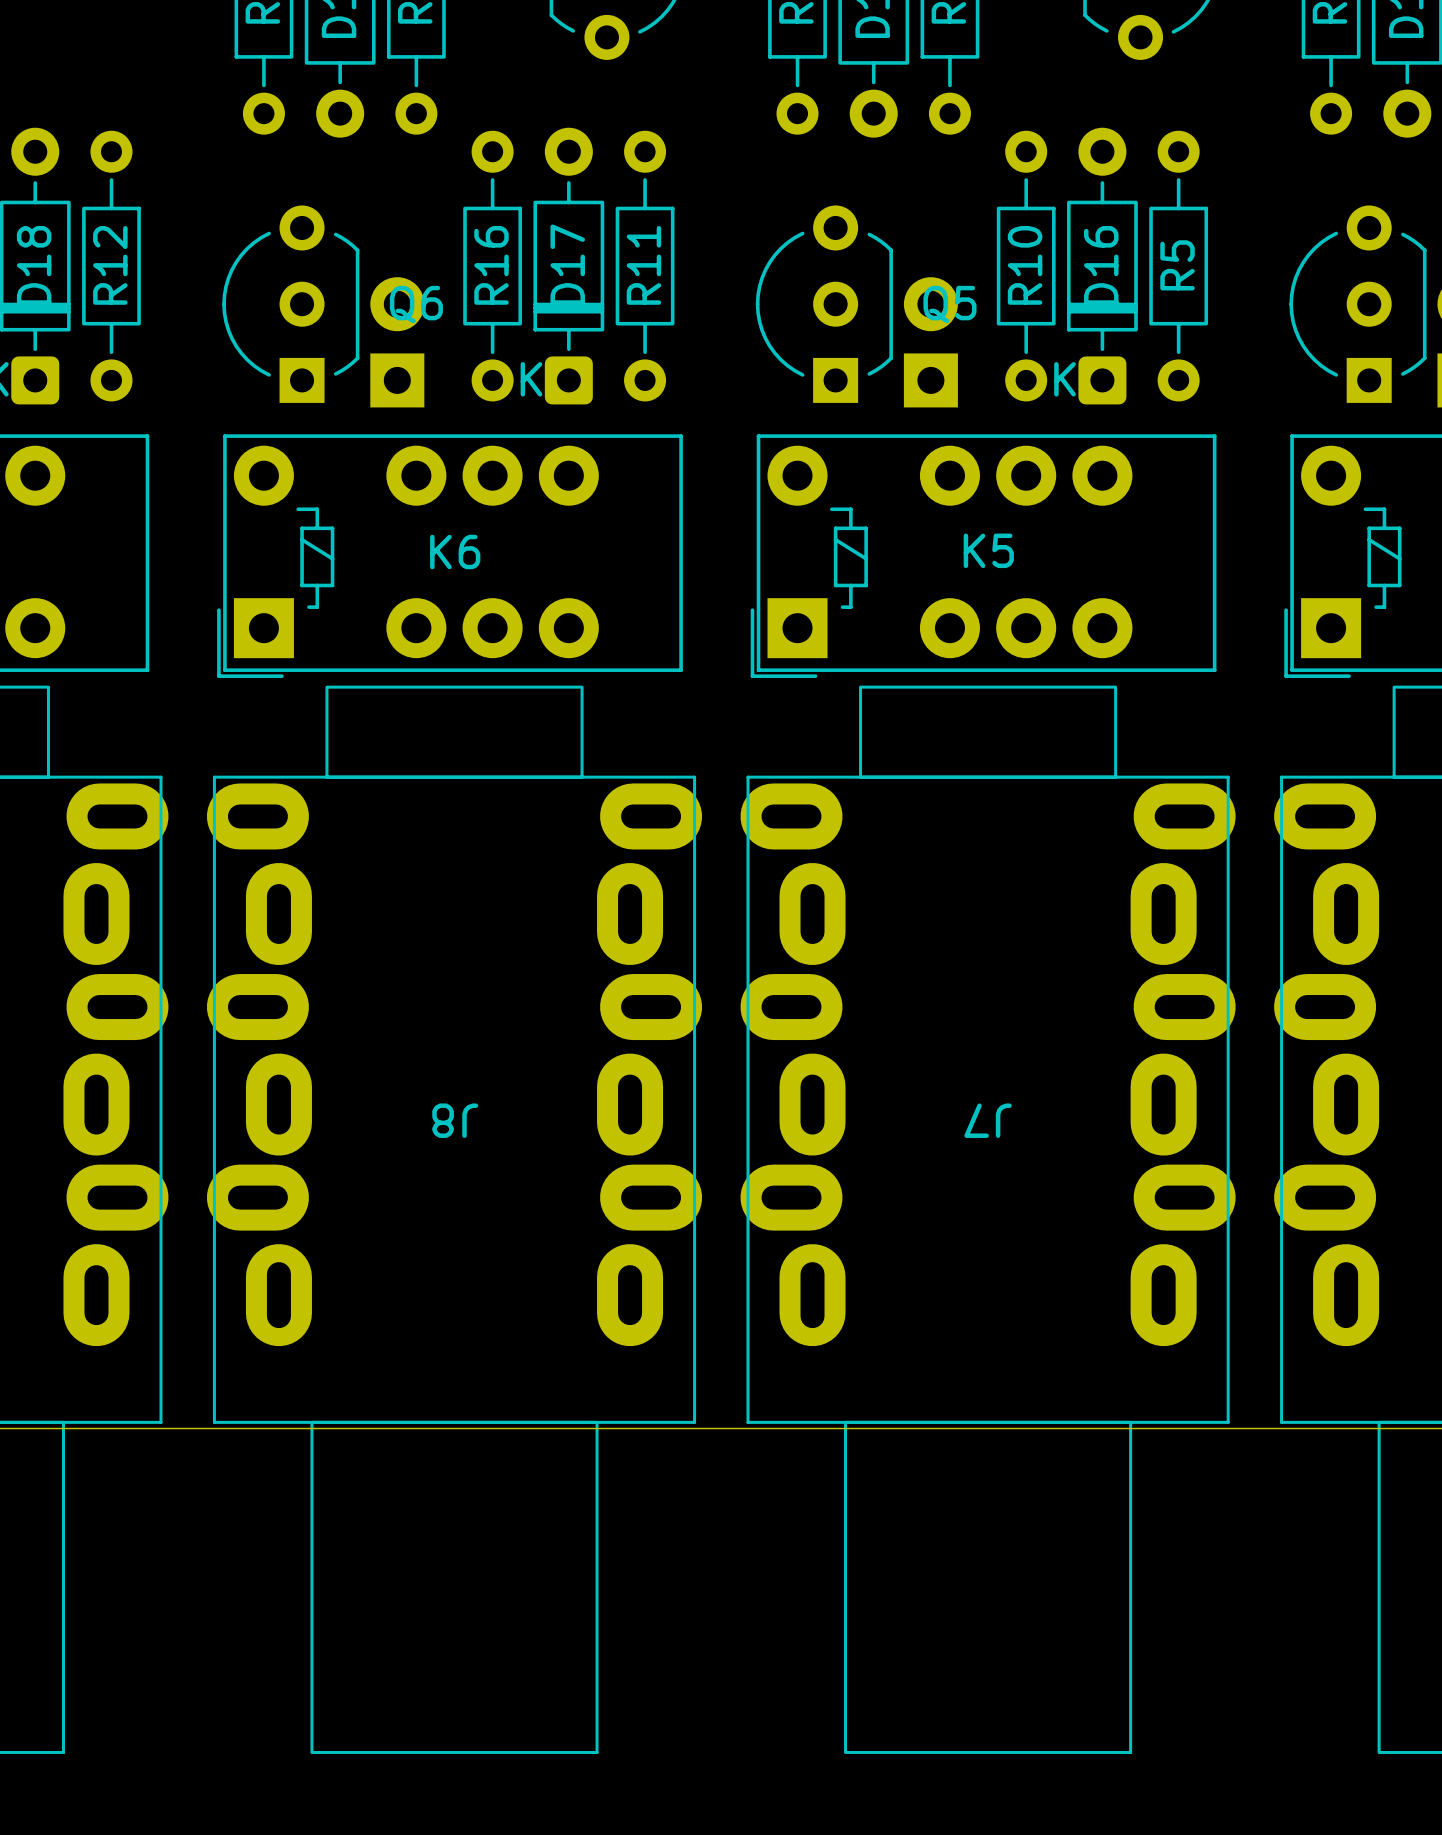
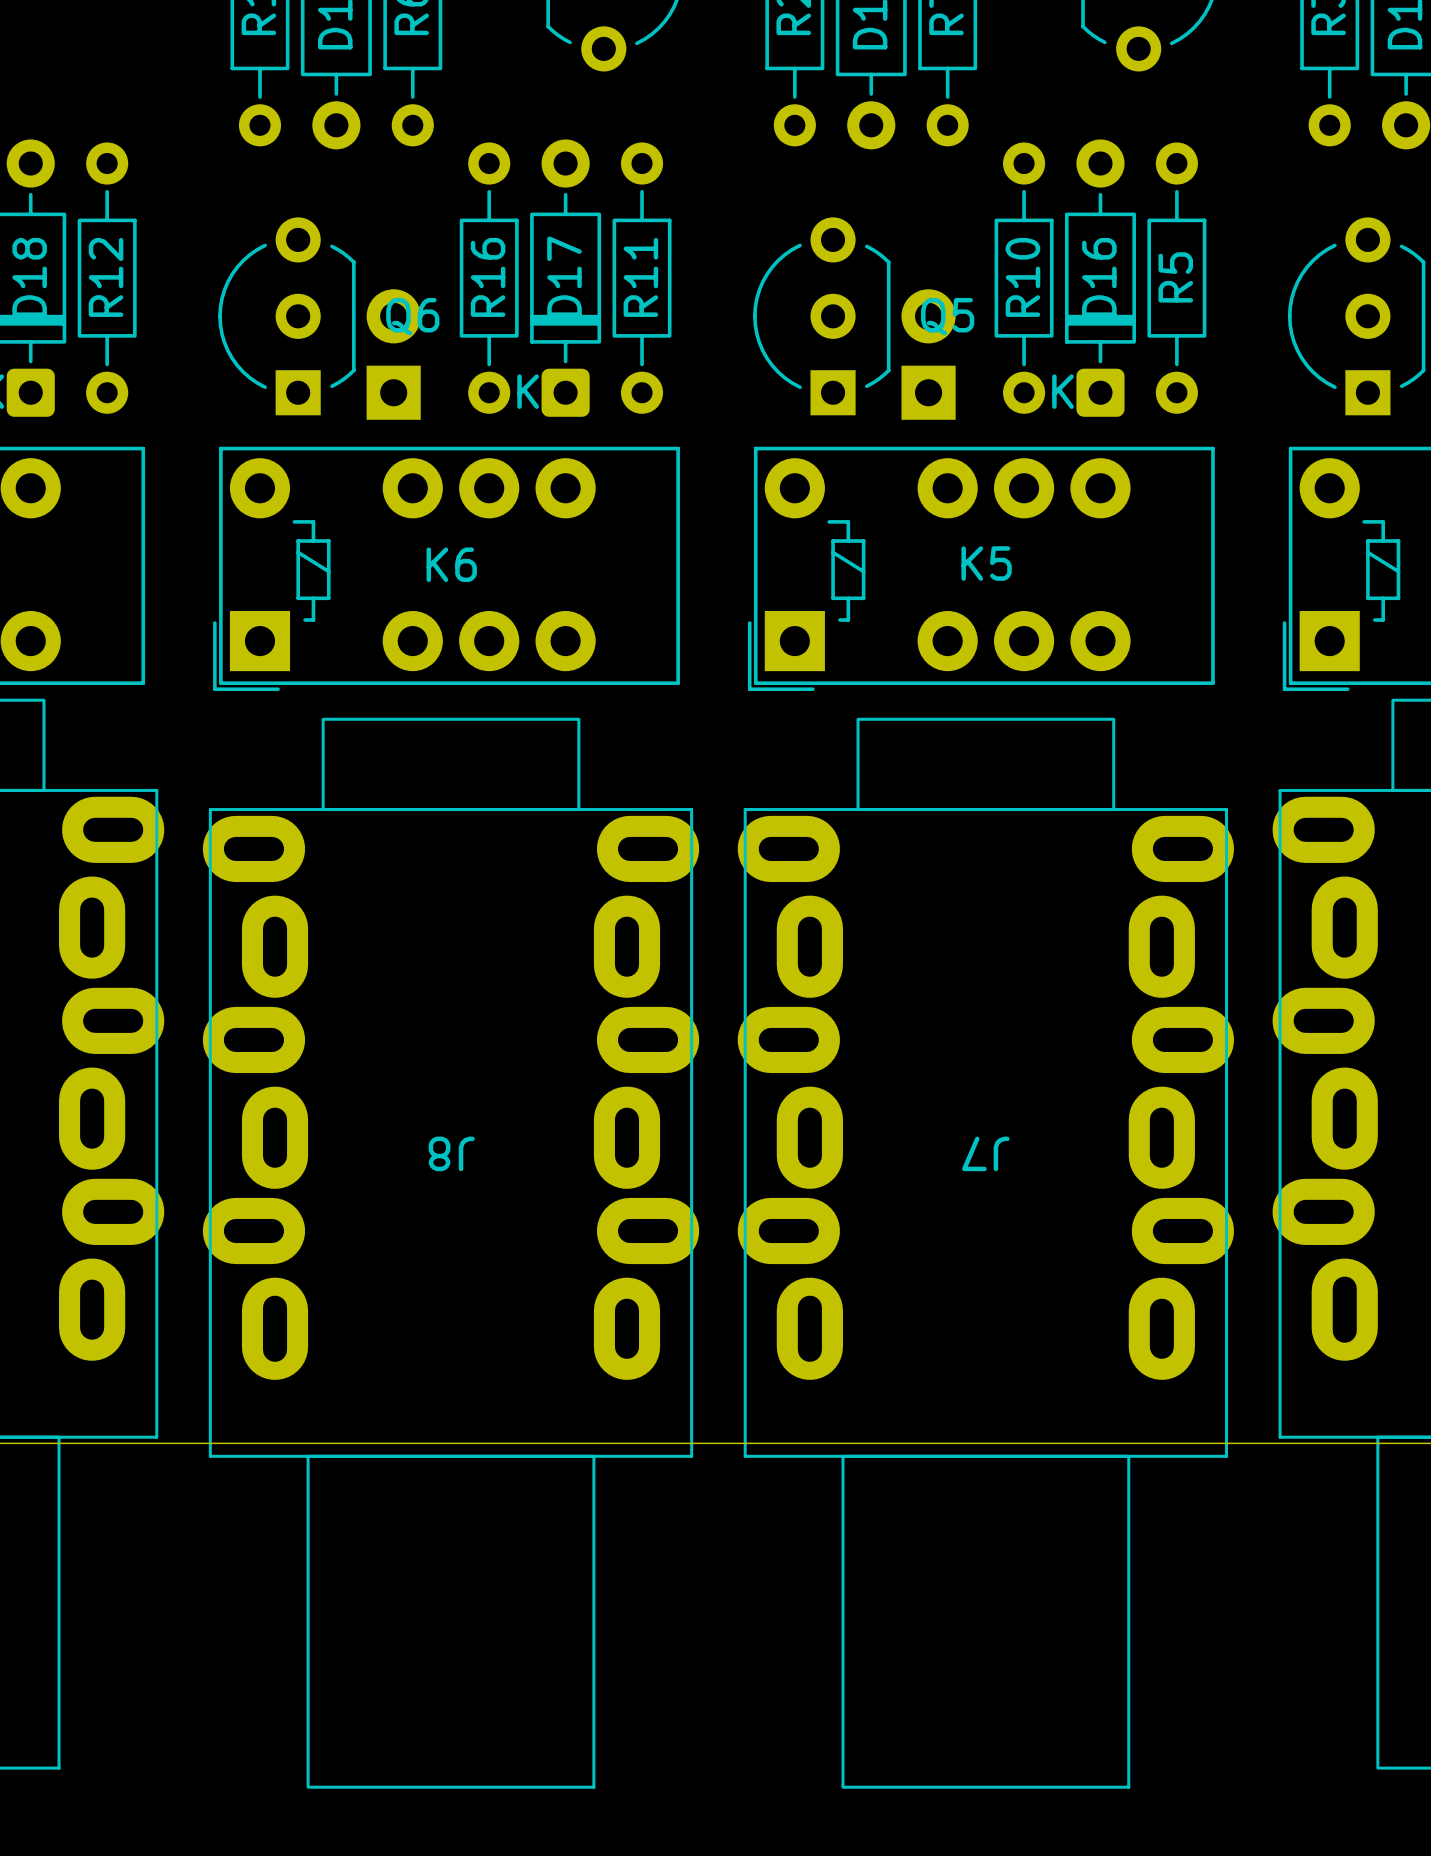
J8 position: (454, 1219) -> (451, 1253)
J7 position: (988, 1219) -> (985, 1253)

